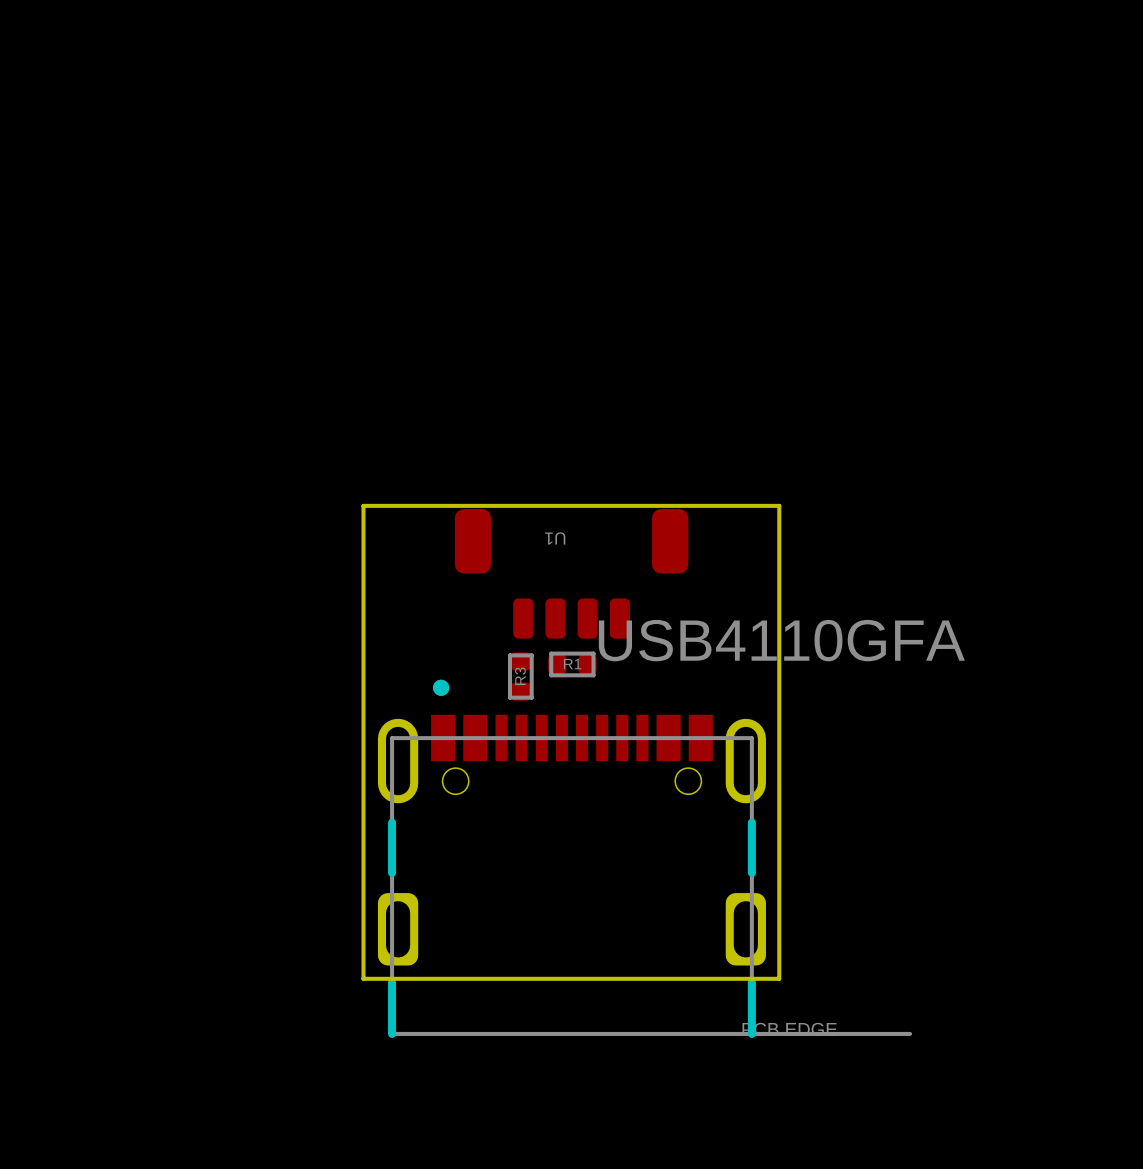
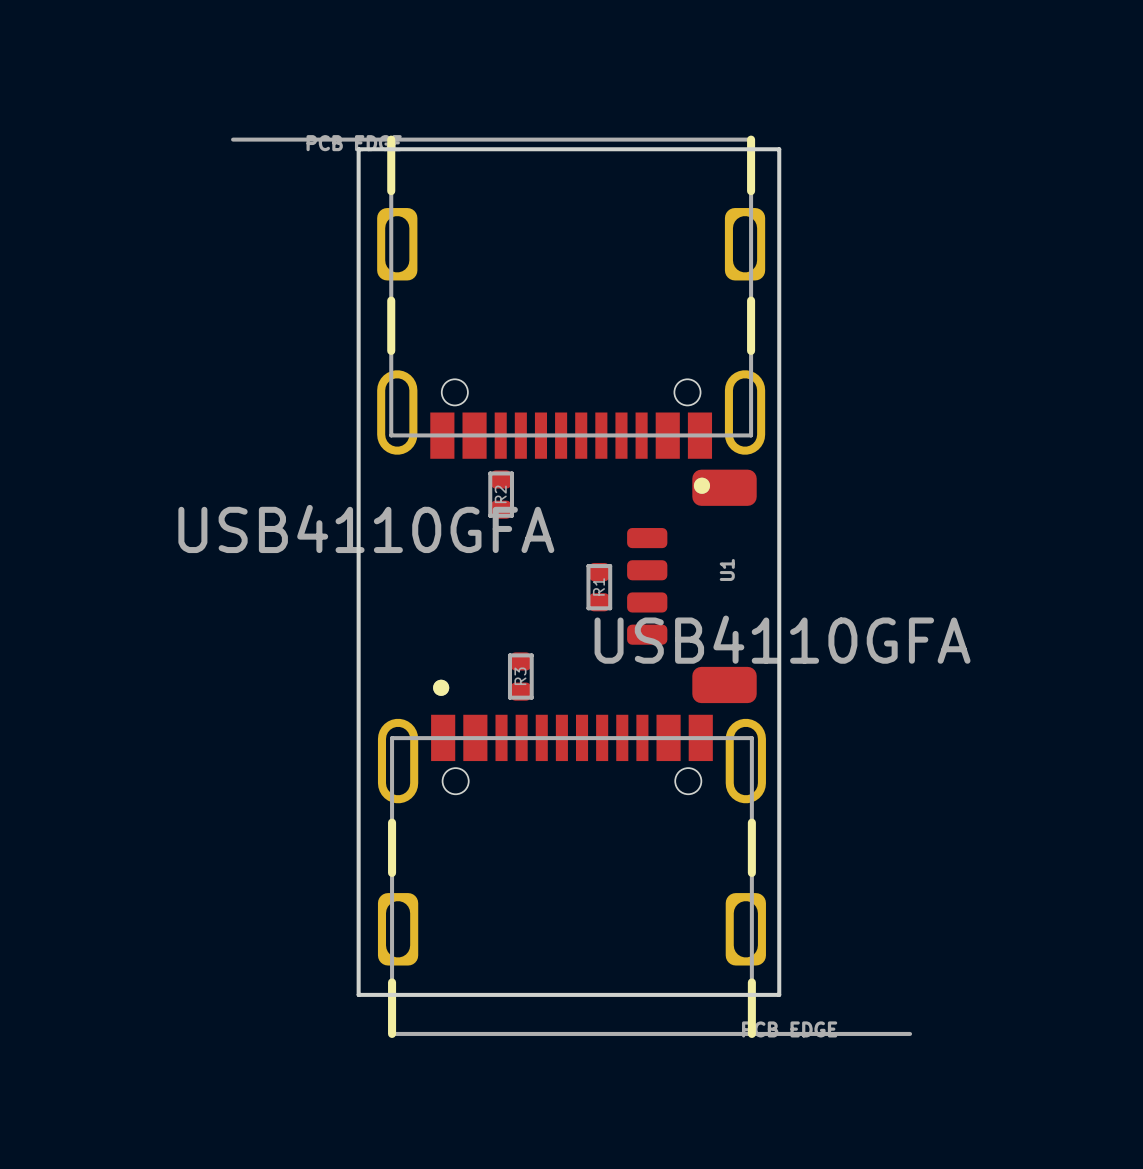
part: none -> USB4110GFA (498, 314)
R2: none -> (501, 494)
board edge: (779, 505) (363, 505) (363, 978) (779, 978) -> (779, 505) (779, 149) (358, 149) (358, 994) (779, 994) (779, 978)
U1 rotation: 0° (571, 573) -> 90° clockwise (691, 586)
R1 rotation: 0° (572, 664) -> 90° clockwise (599, 587)
R1 position: (572, 664) -> (599, 587)

